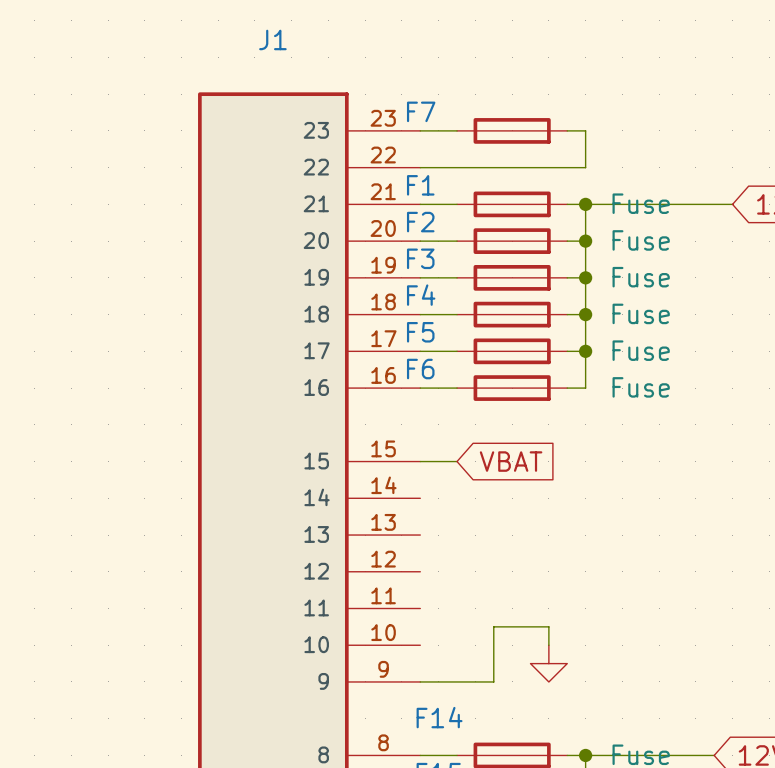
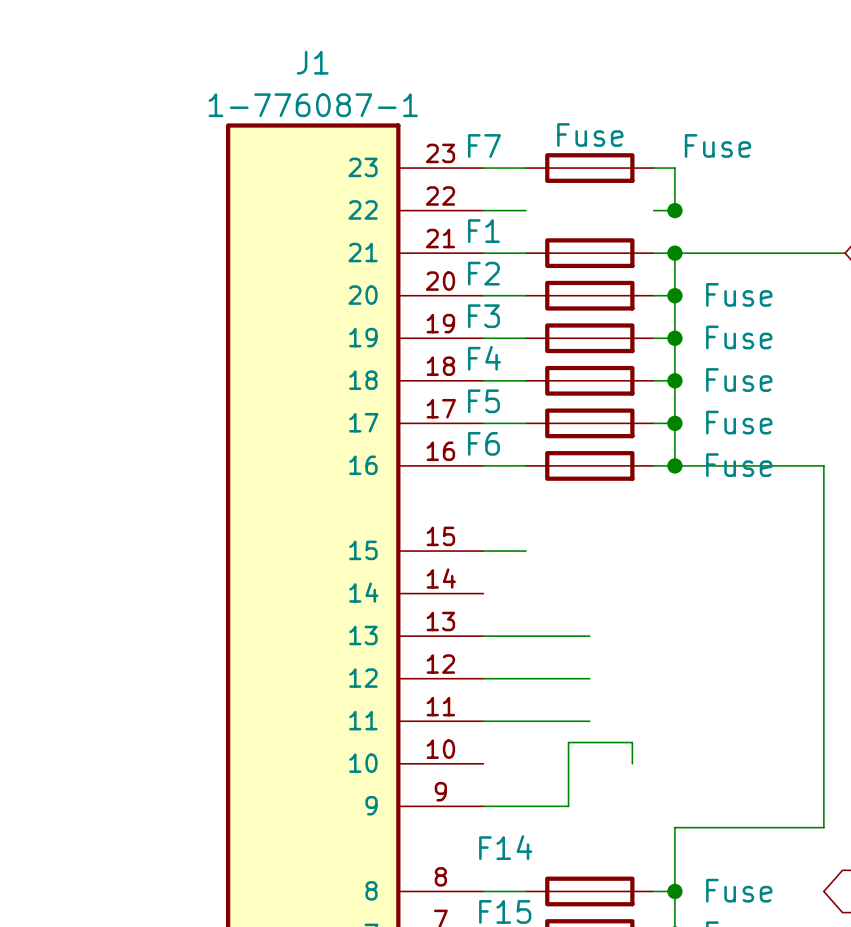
J1 value: none -> 1-776087-1 (313, 105)
F7 value: none -> Fuse (590, 135)
wire: (457, 167) (567, 167) -> none
junction: none -> (674, 210)
F1 value position: Fuse (641, 203) -> Fuse (717, 145)
junction: none -> (674, 465)
global label: VBAT (511, 461) -> none
wire: none -> (483, 636) (589, 636)
wire: none -> (483, 678) (589, 678)
wire: none -> (483, 721) (589, 721)
power symbol: (548, 663) -> none
wire: (585, 755) (714, 755) -> (674, 891) (674, 827) (823, 827) (823, 465) (674, 465)

